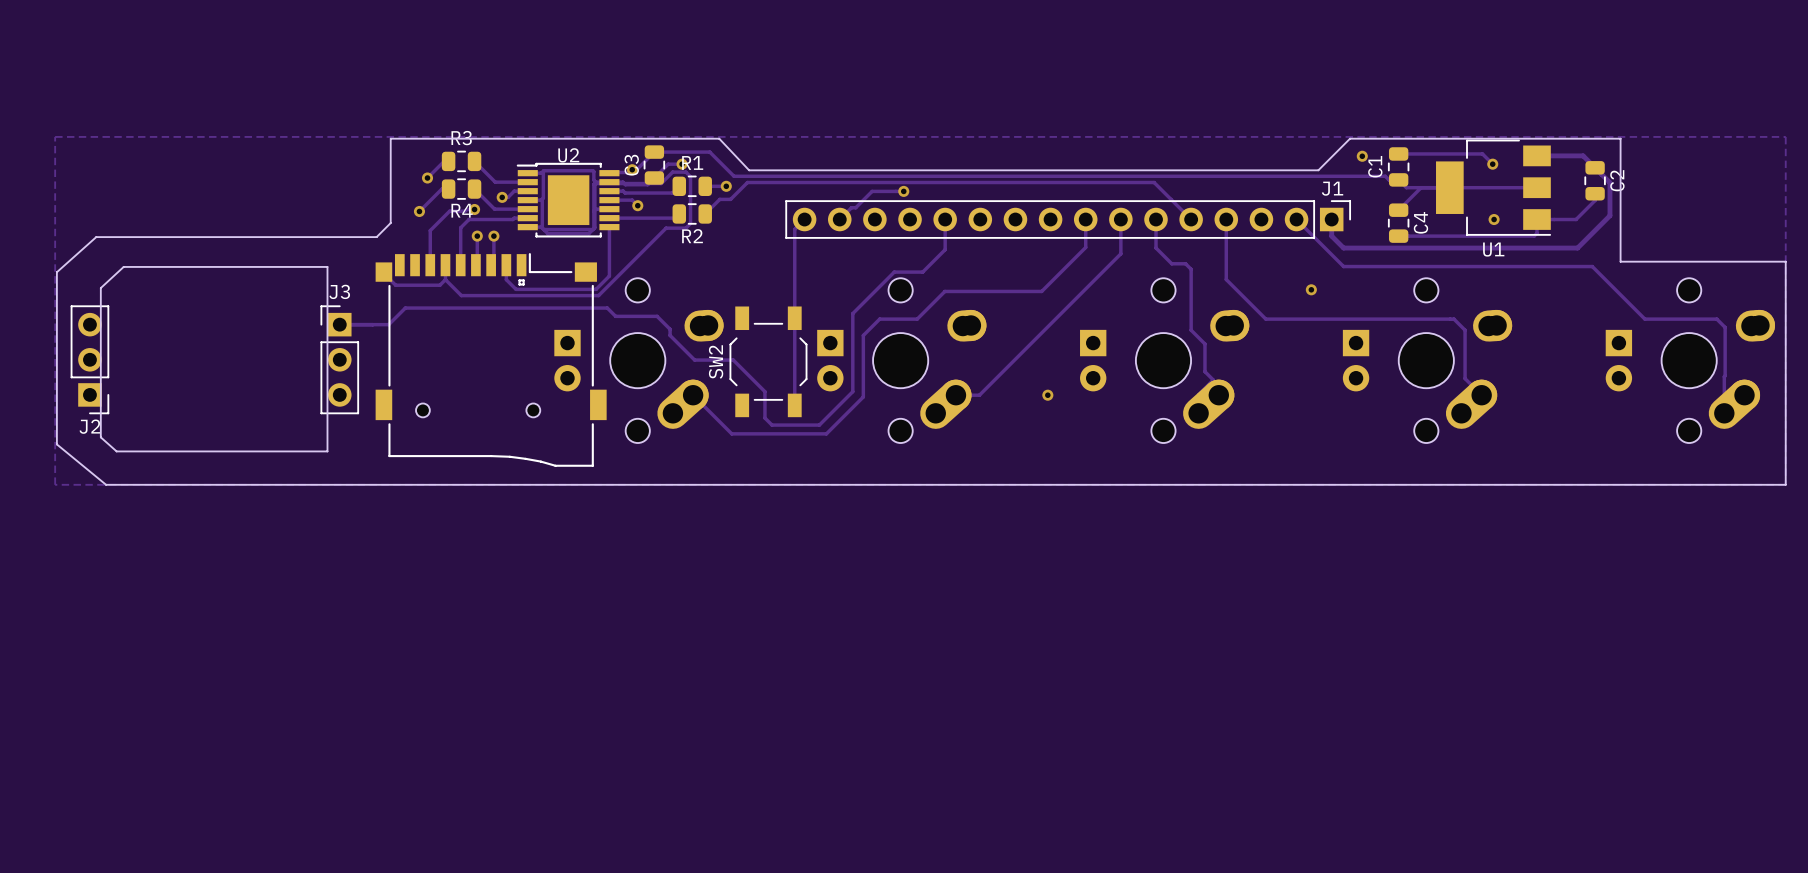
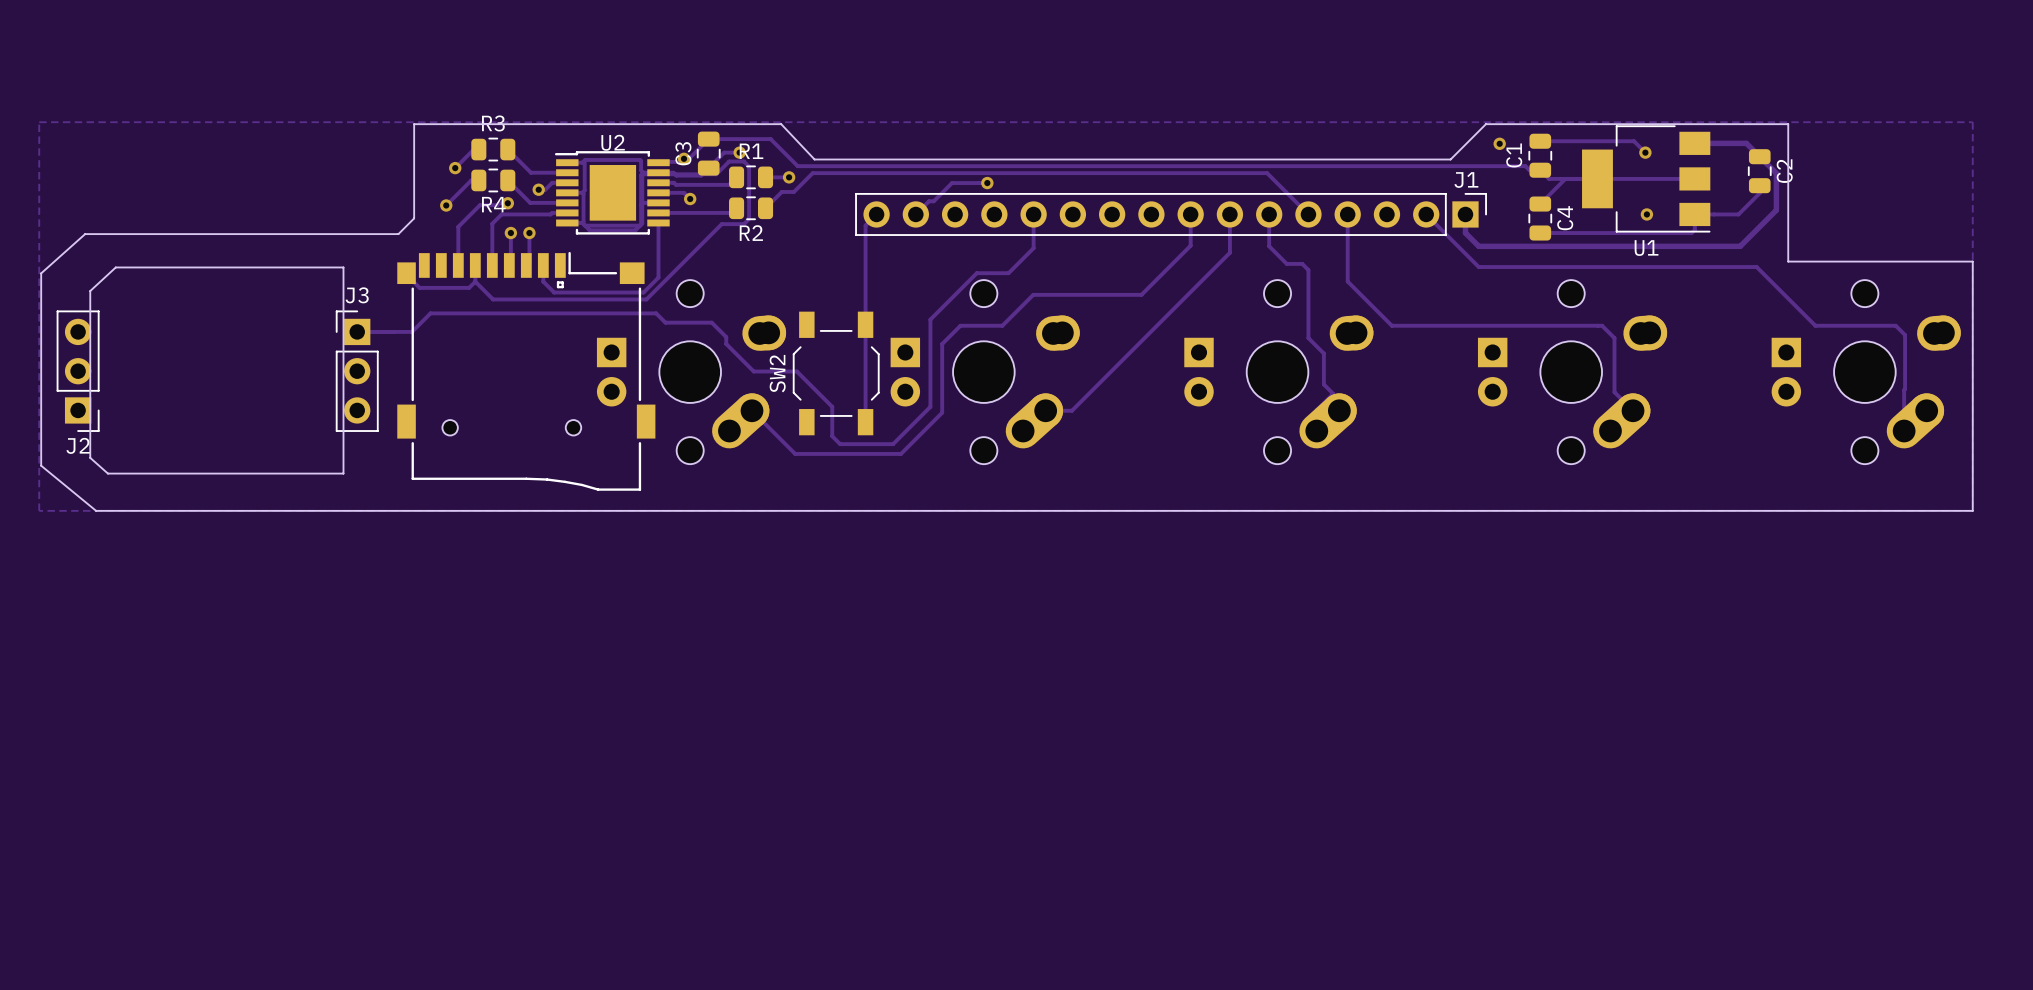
via: (1311, 289) -> none
via: (1047, 395) -> none

